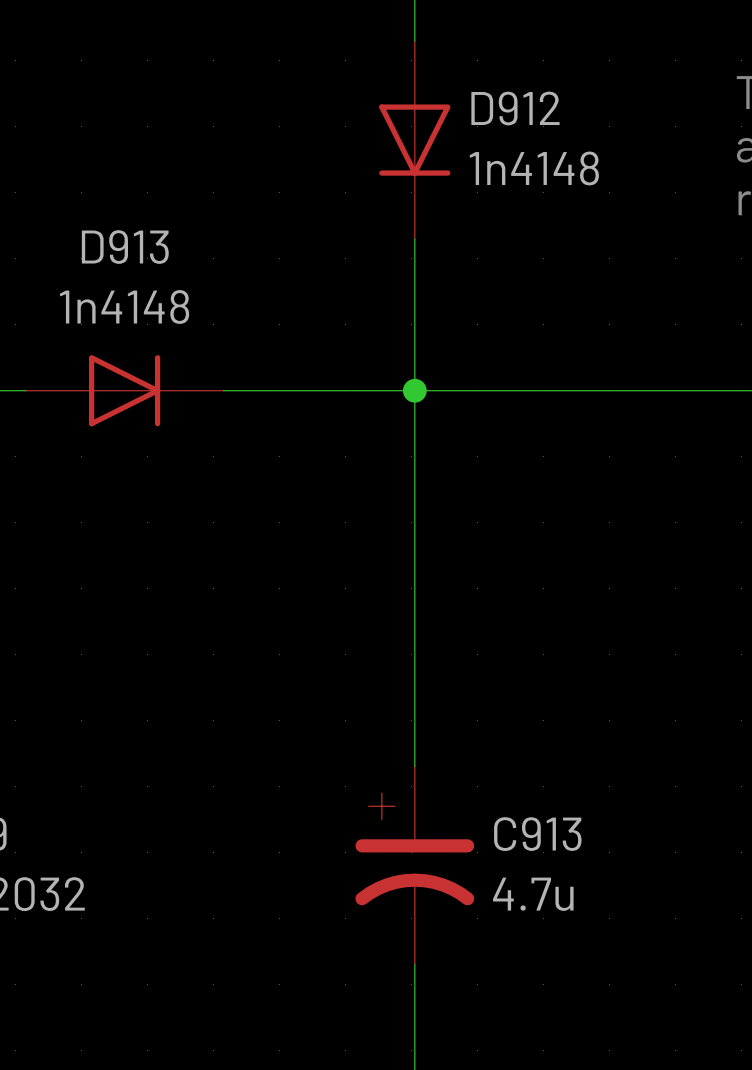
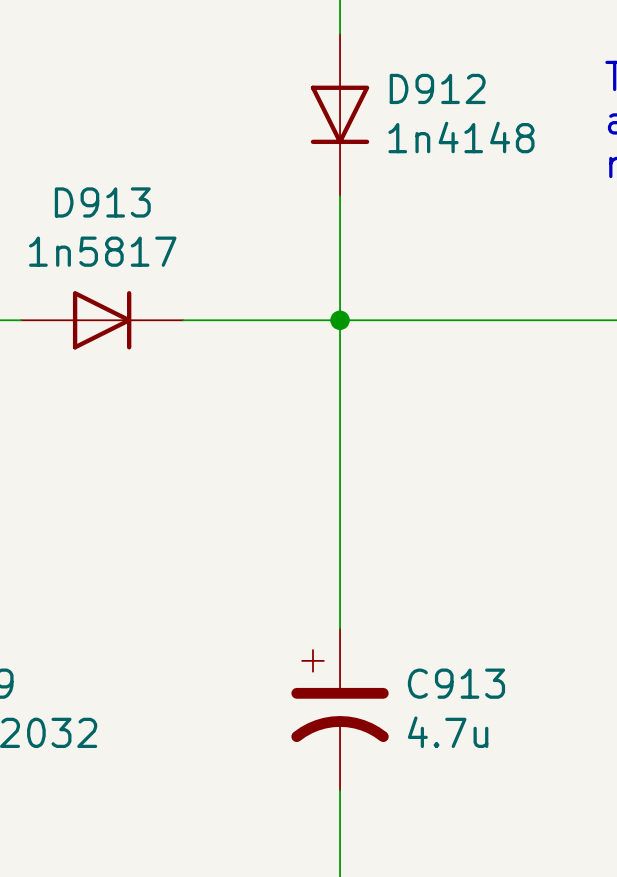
D913 value: 1n4148 (124, 306) -> 1n5817 (102, 251)

